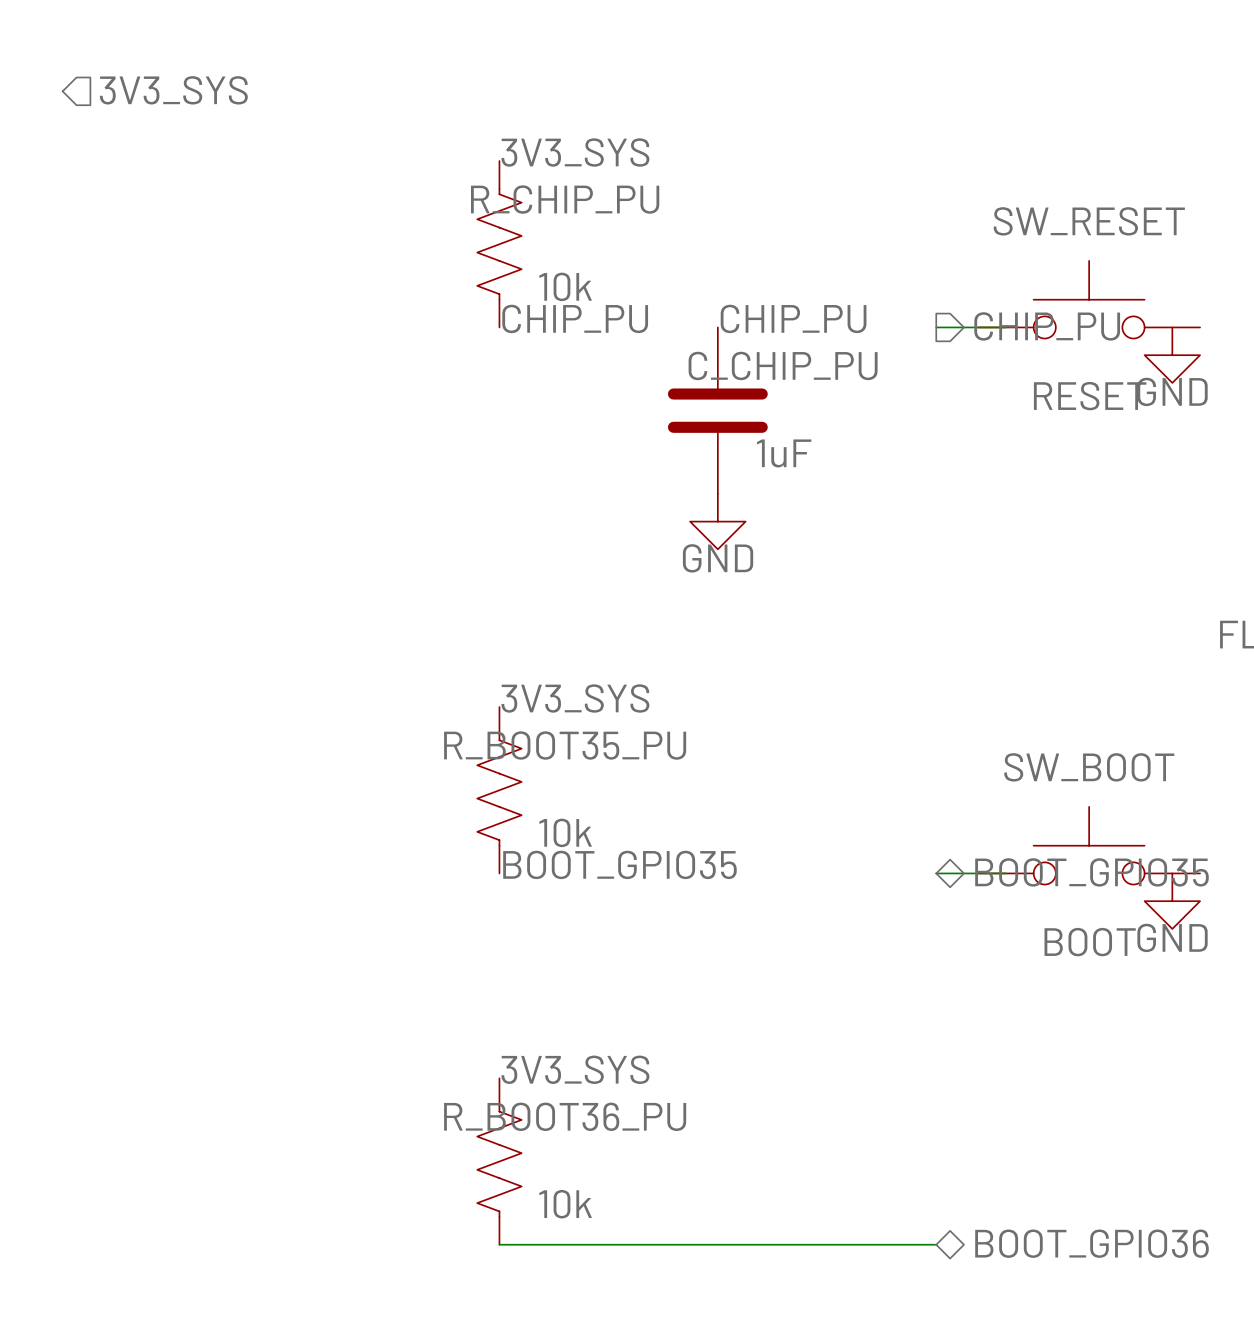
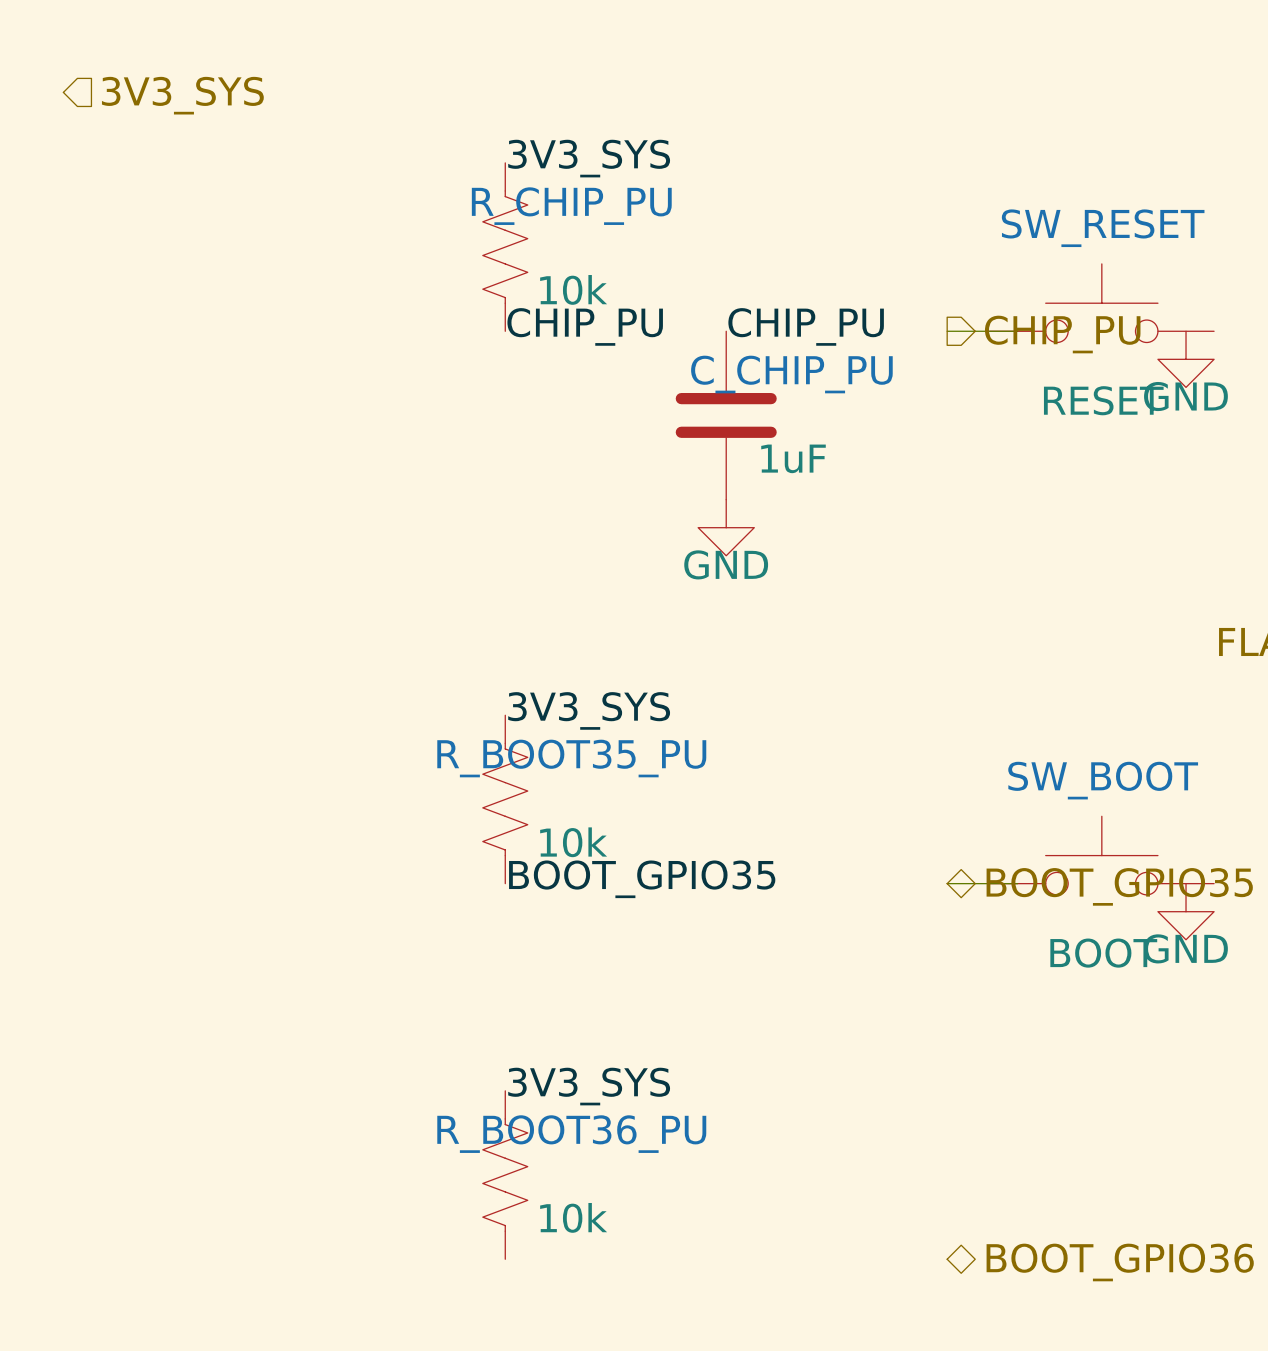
wire: (499, 1244) (936, 1244) -> none

